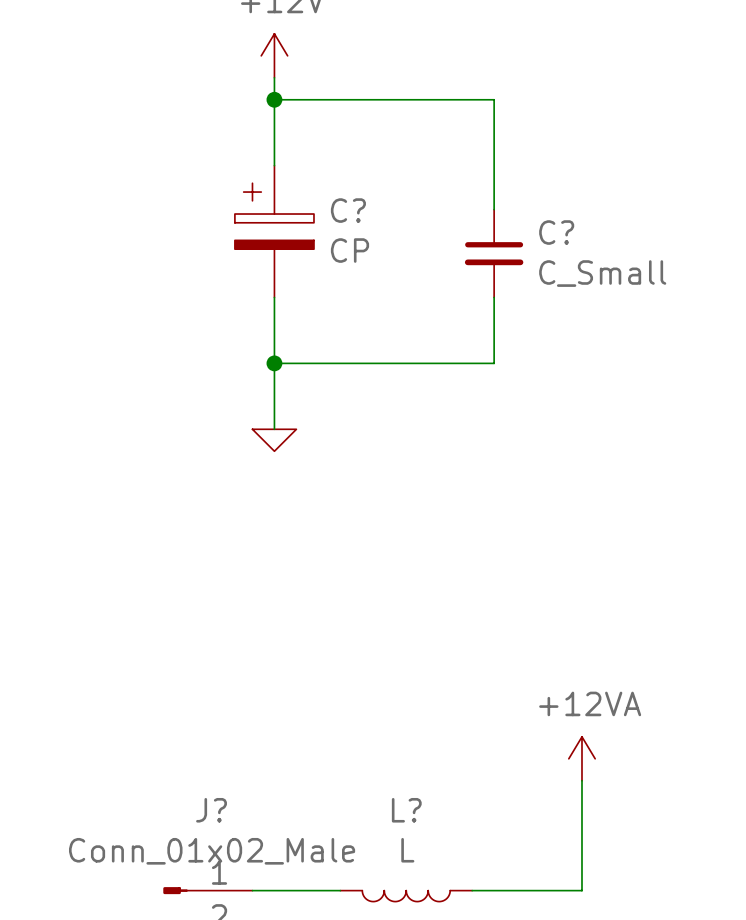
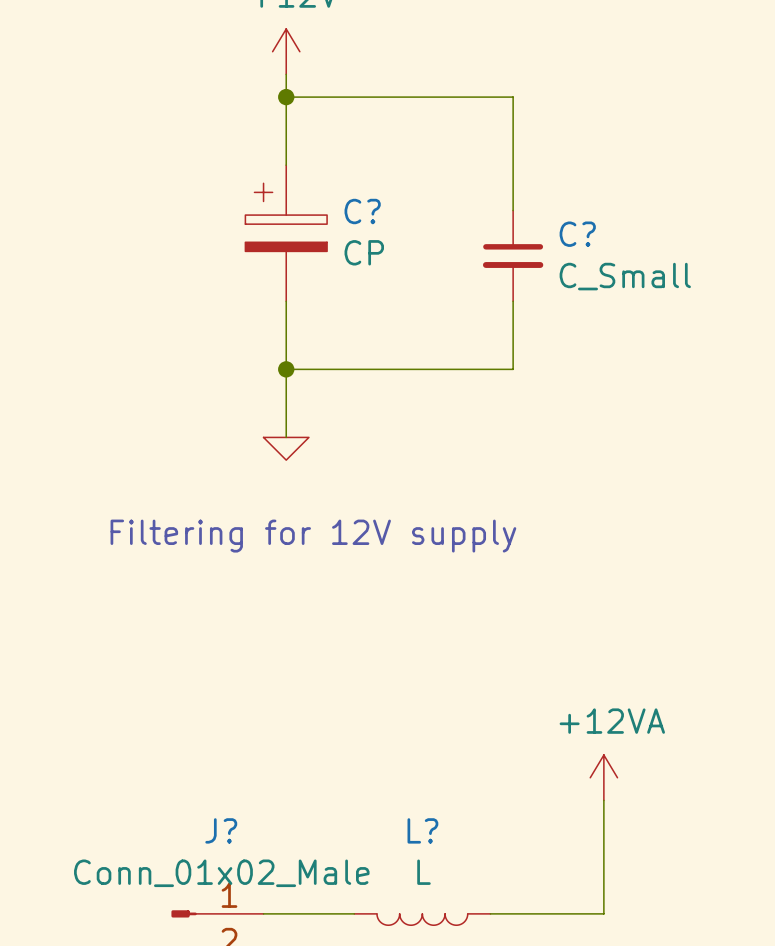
text: none -> Filtering for 12V supply (313, 536)

